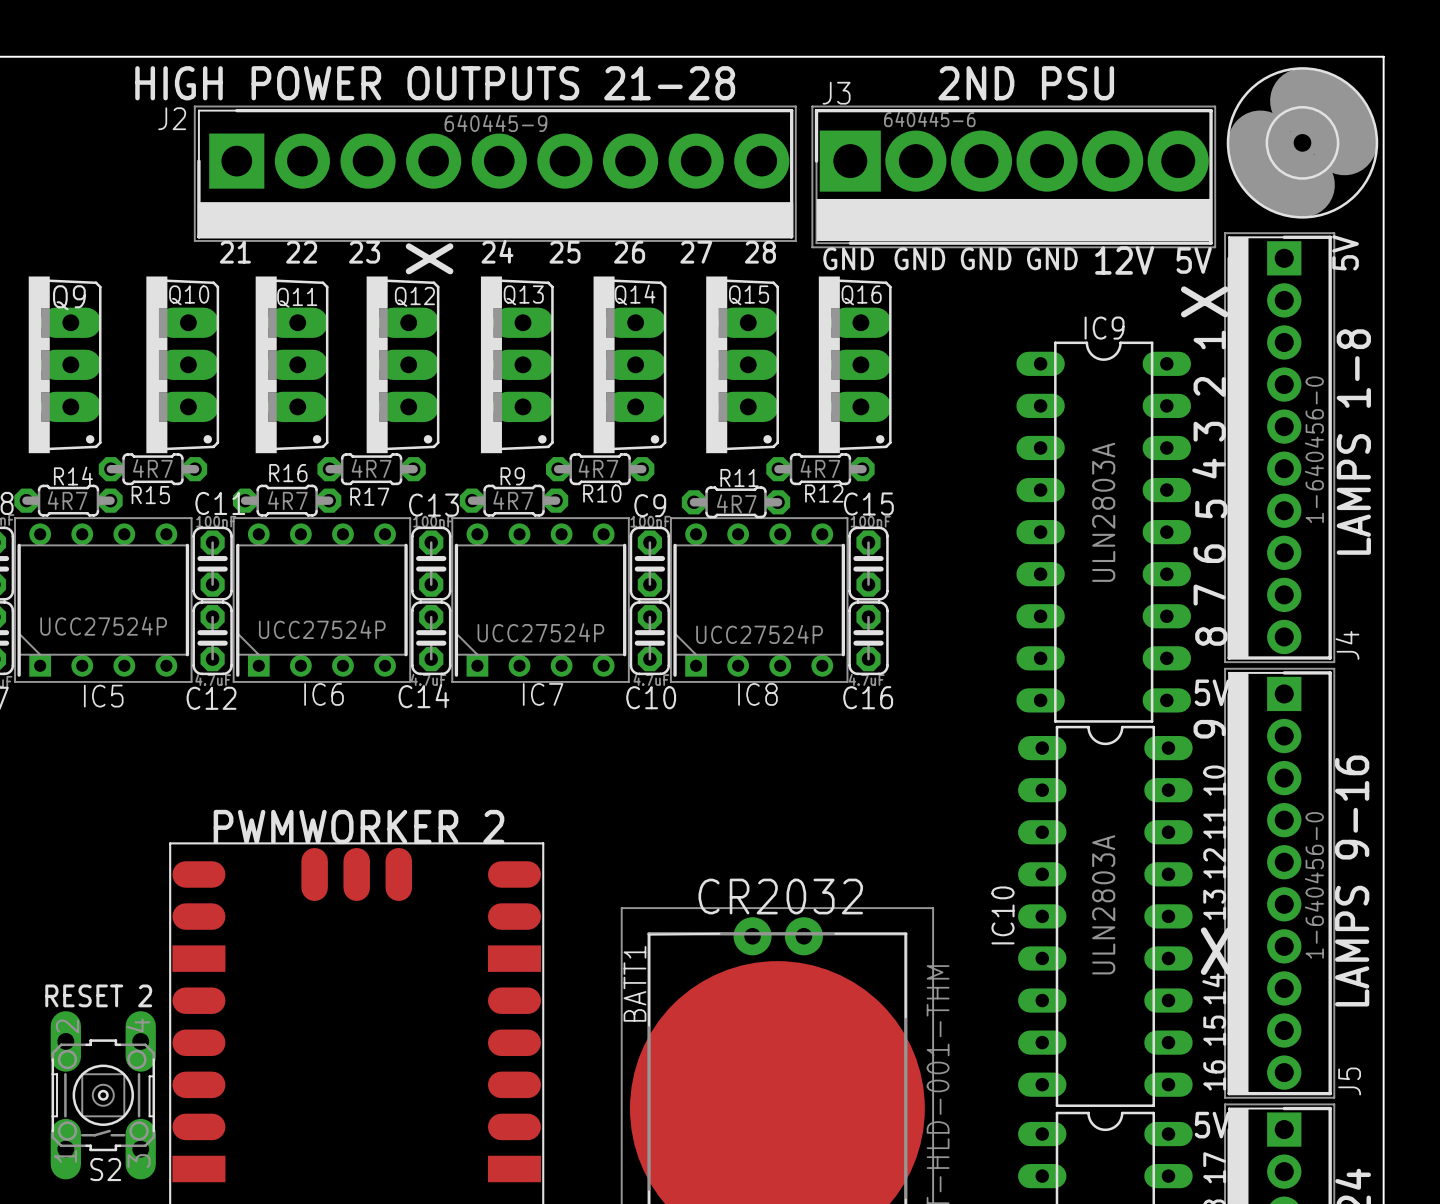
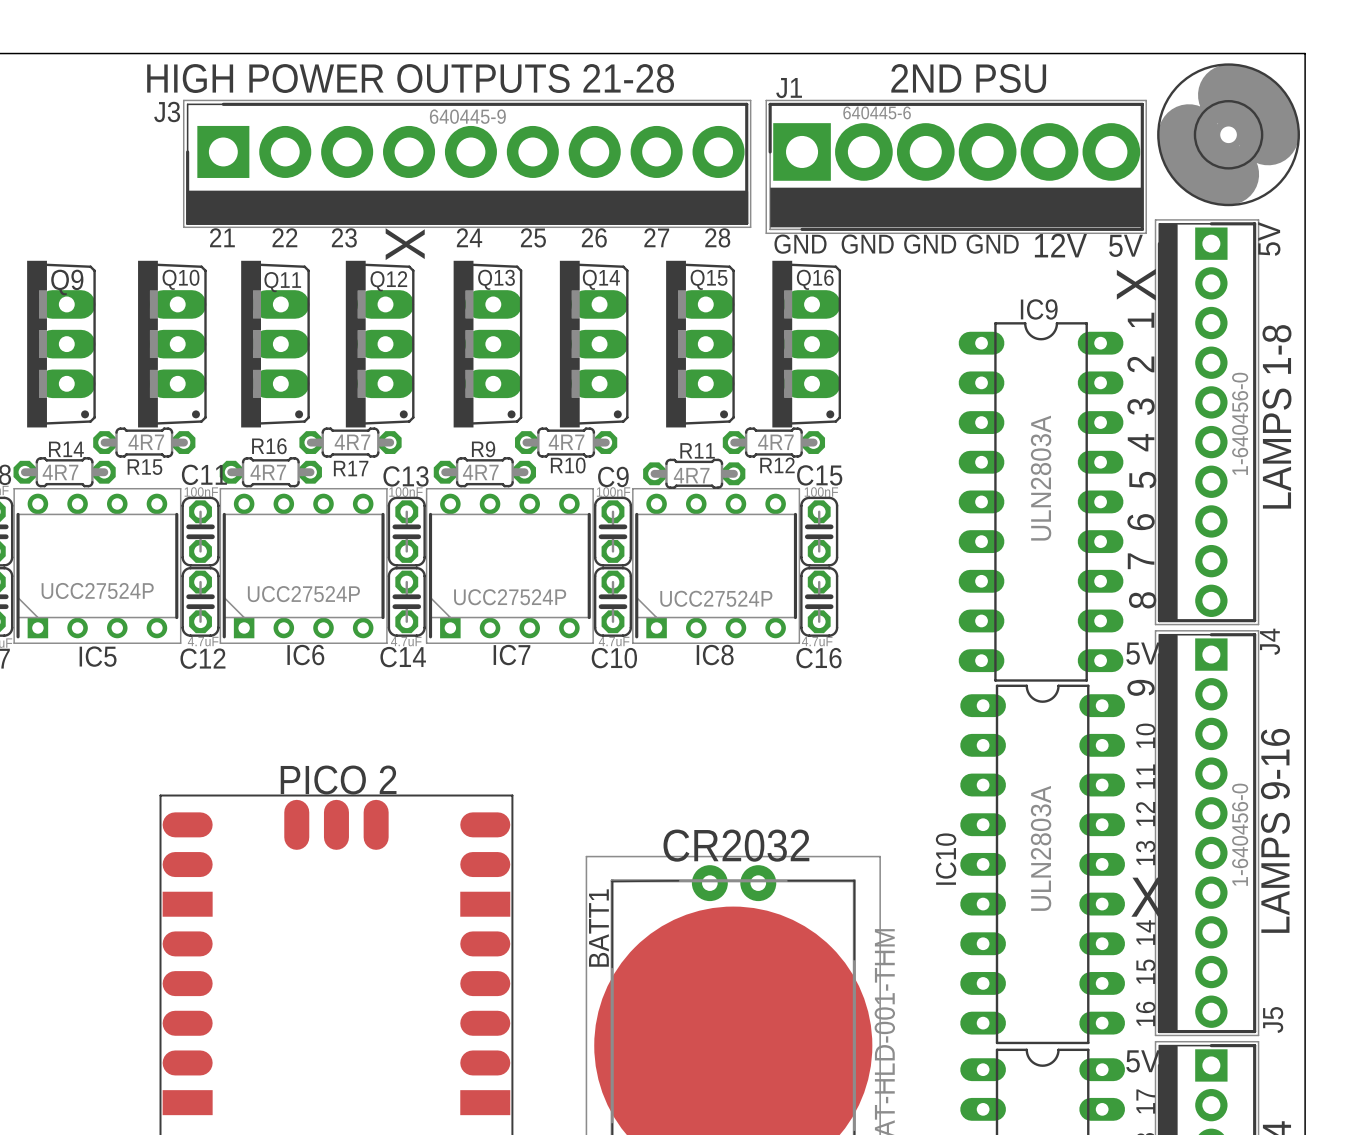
J3 name: J3 (836, 93) -> J1 (789, 88)
J2 name: J2 (172, 118) -> J3 (167, 111)
J4 name position: J4 (1347, 645) -> J4 (1270, 641)
text: PWMWORKER 2 (359, 826) -> PICO 2 (338, 780)
text: RESET 2 (98, 995) -> none
S2: (103, 1095) -> none

